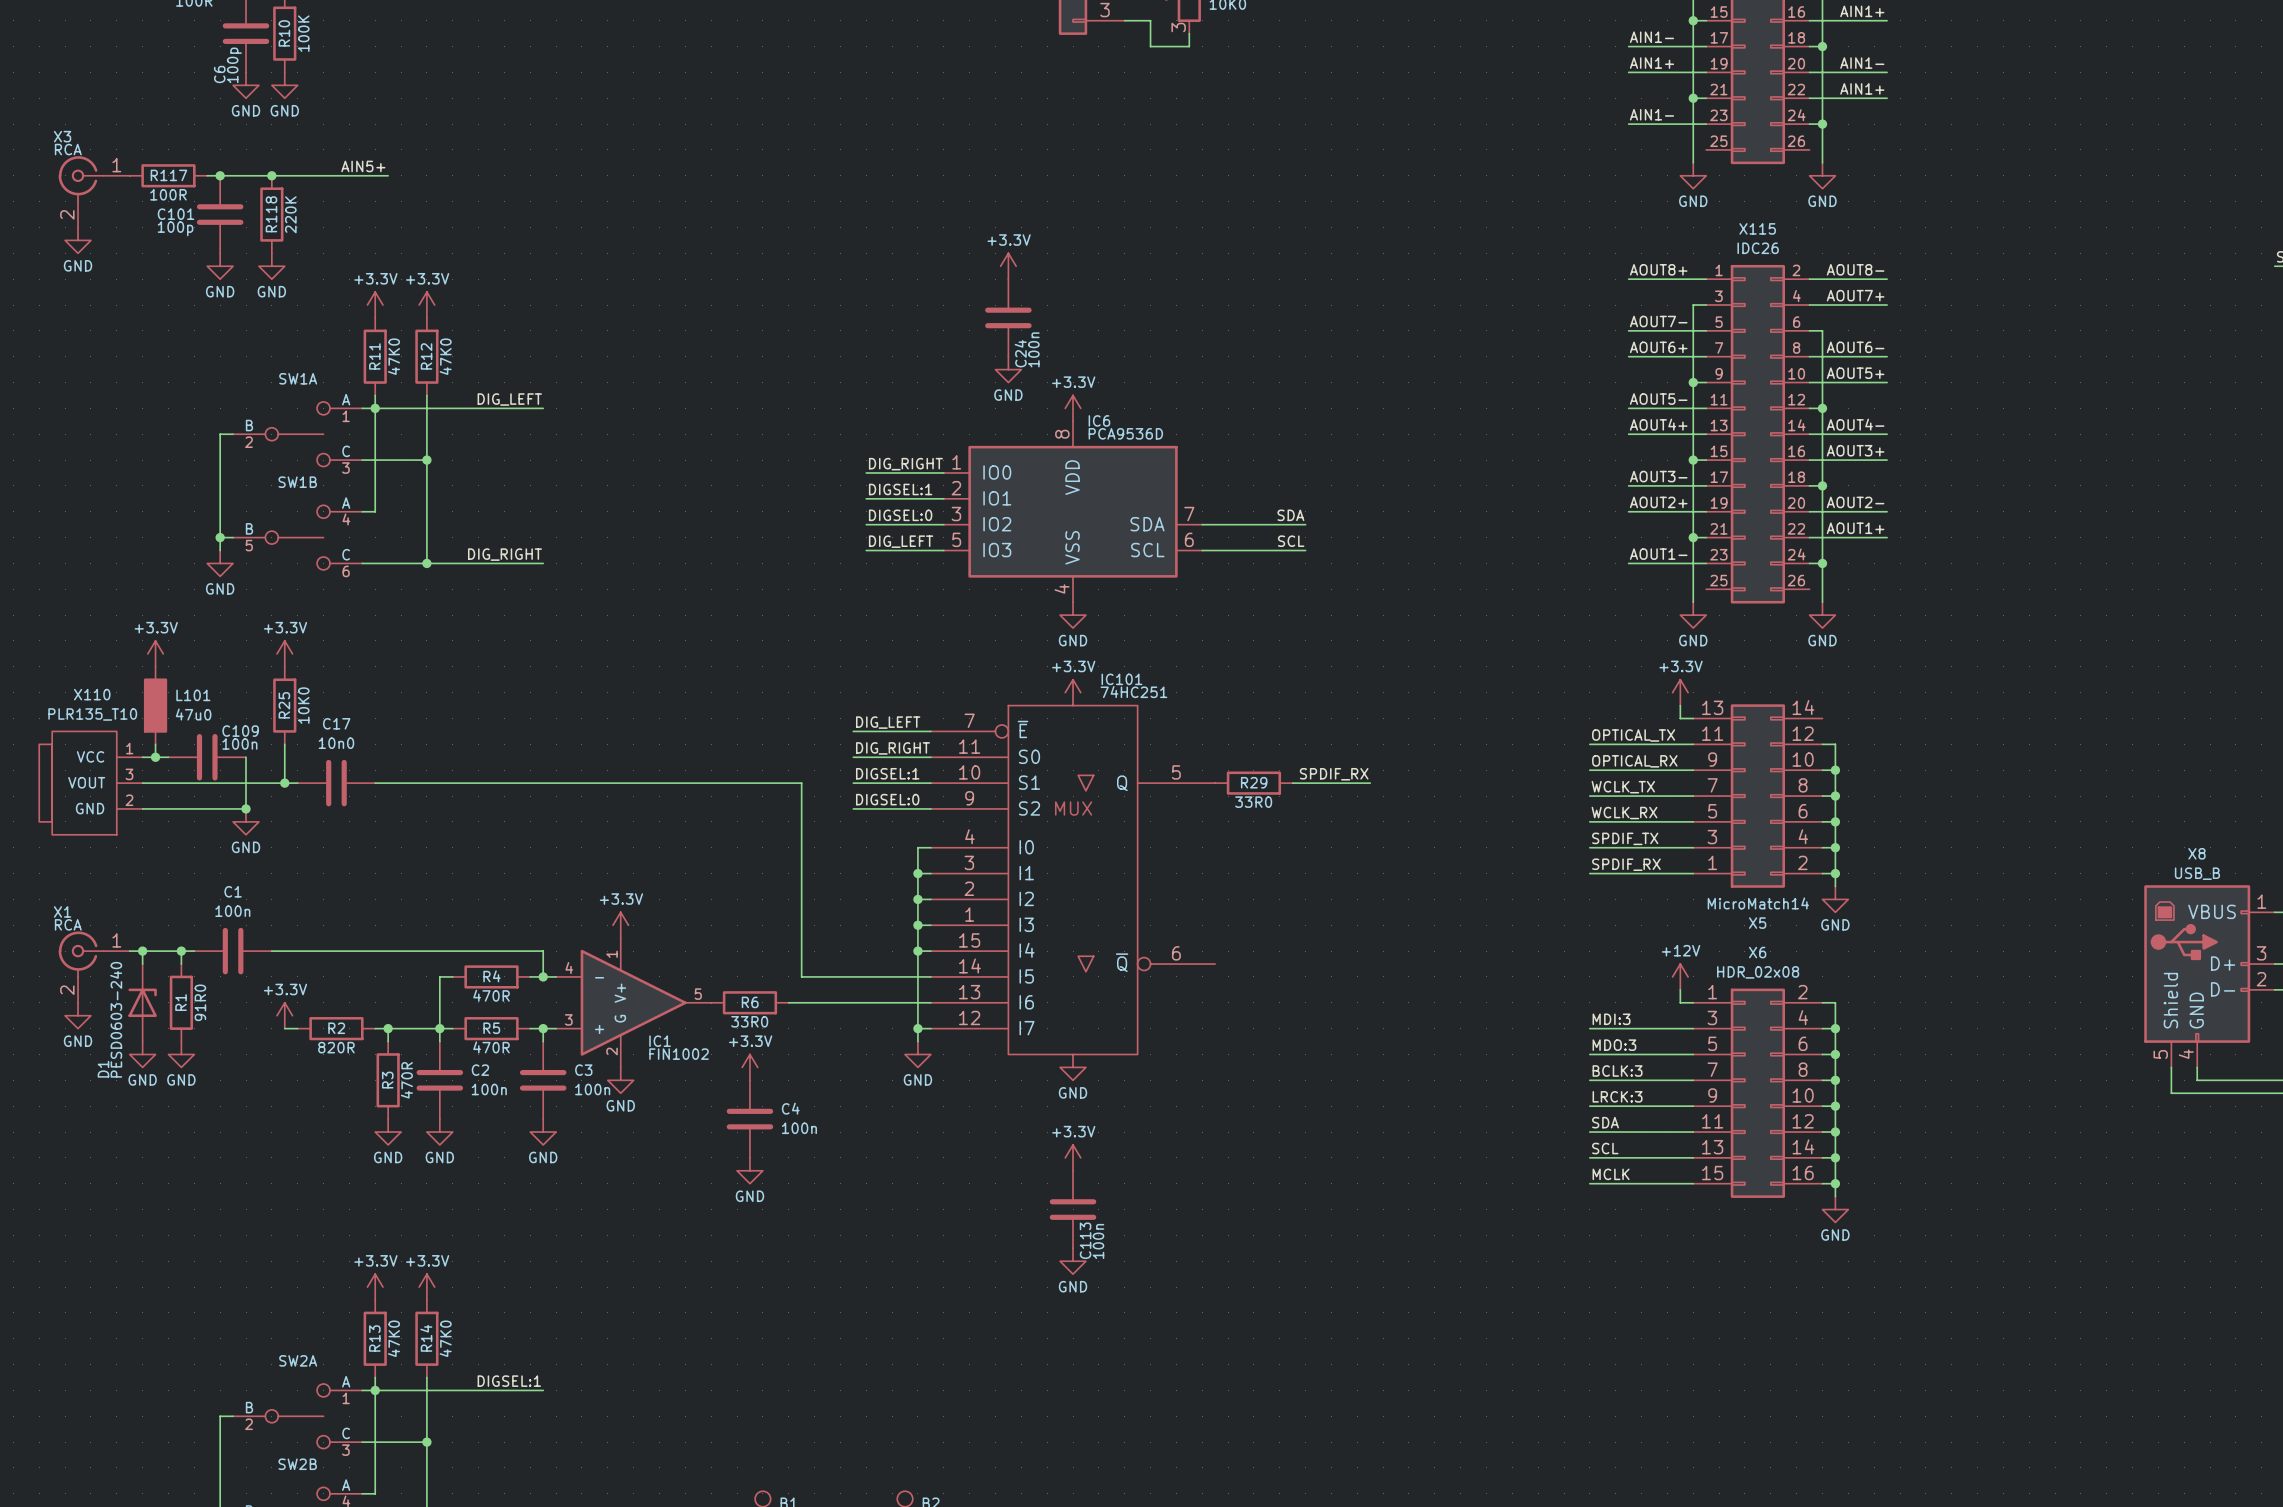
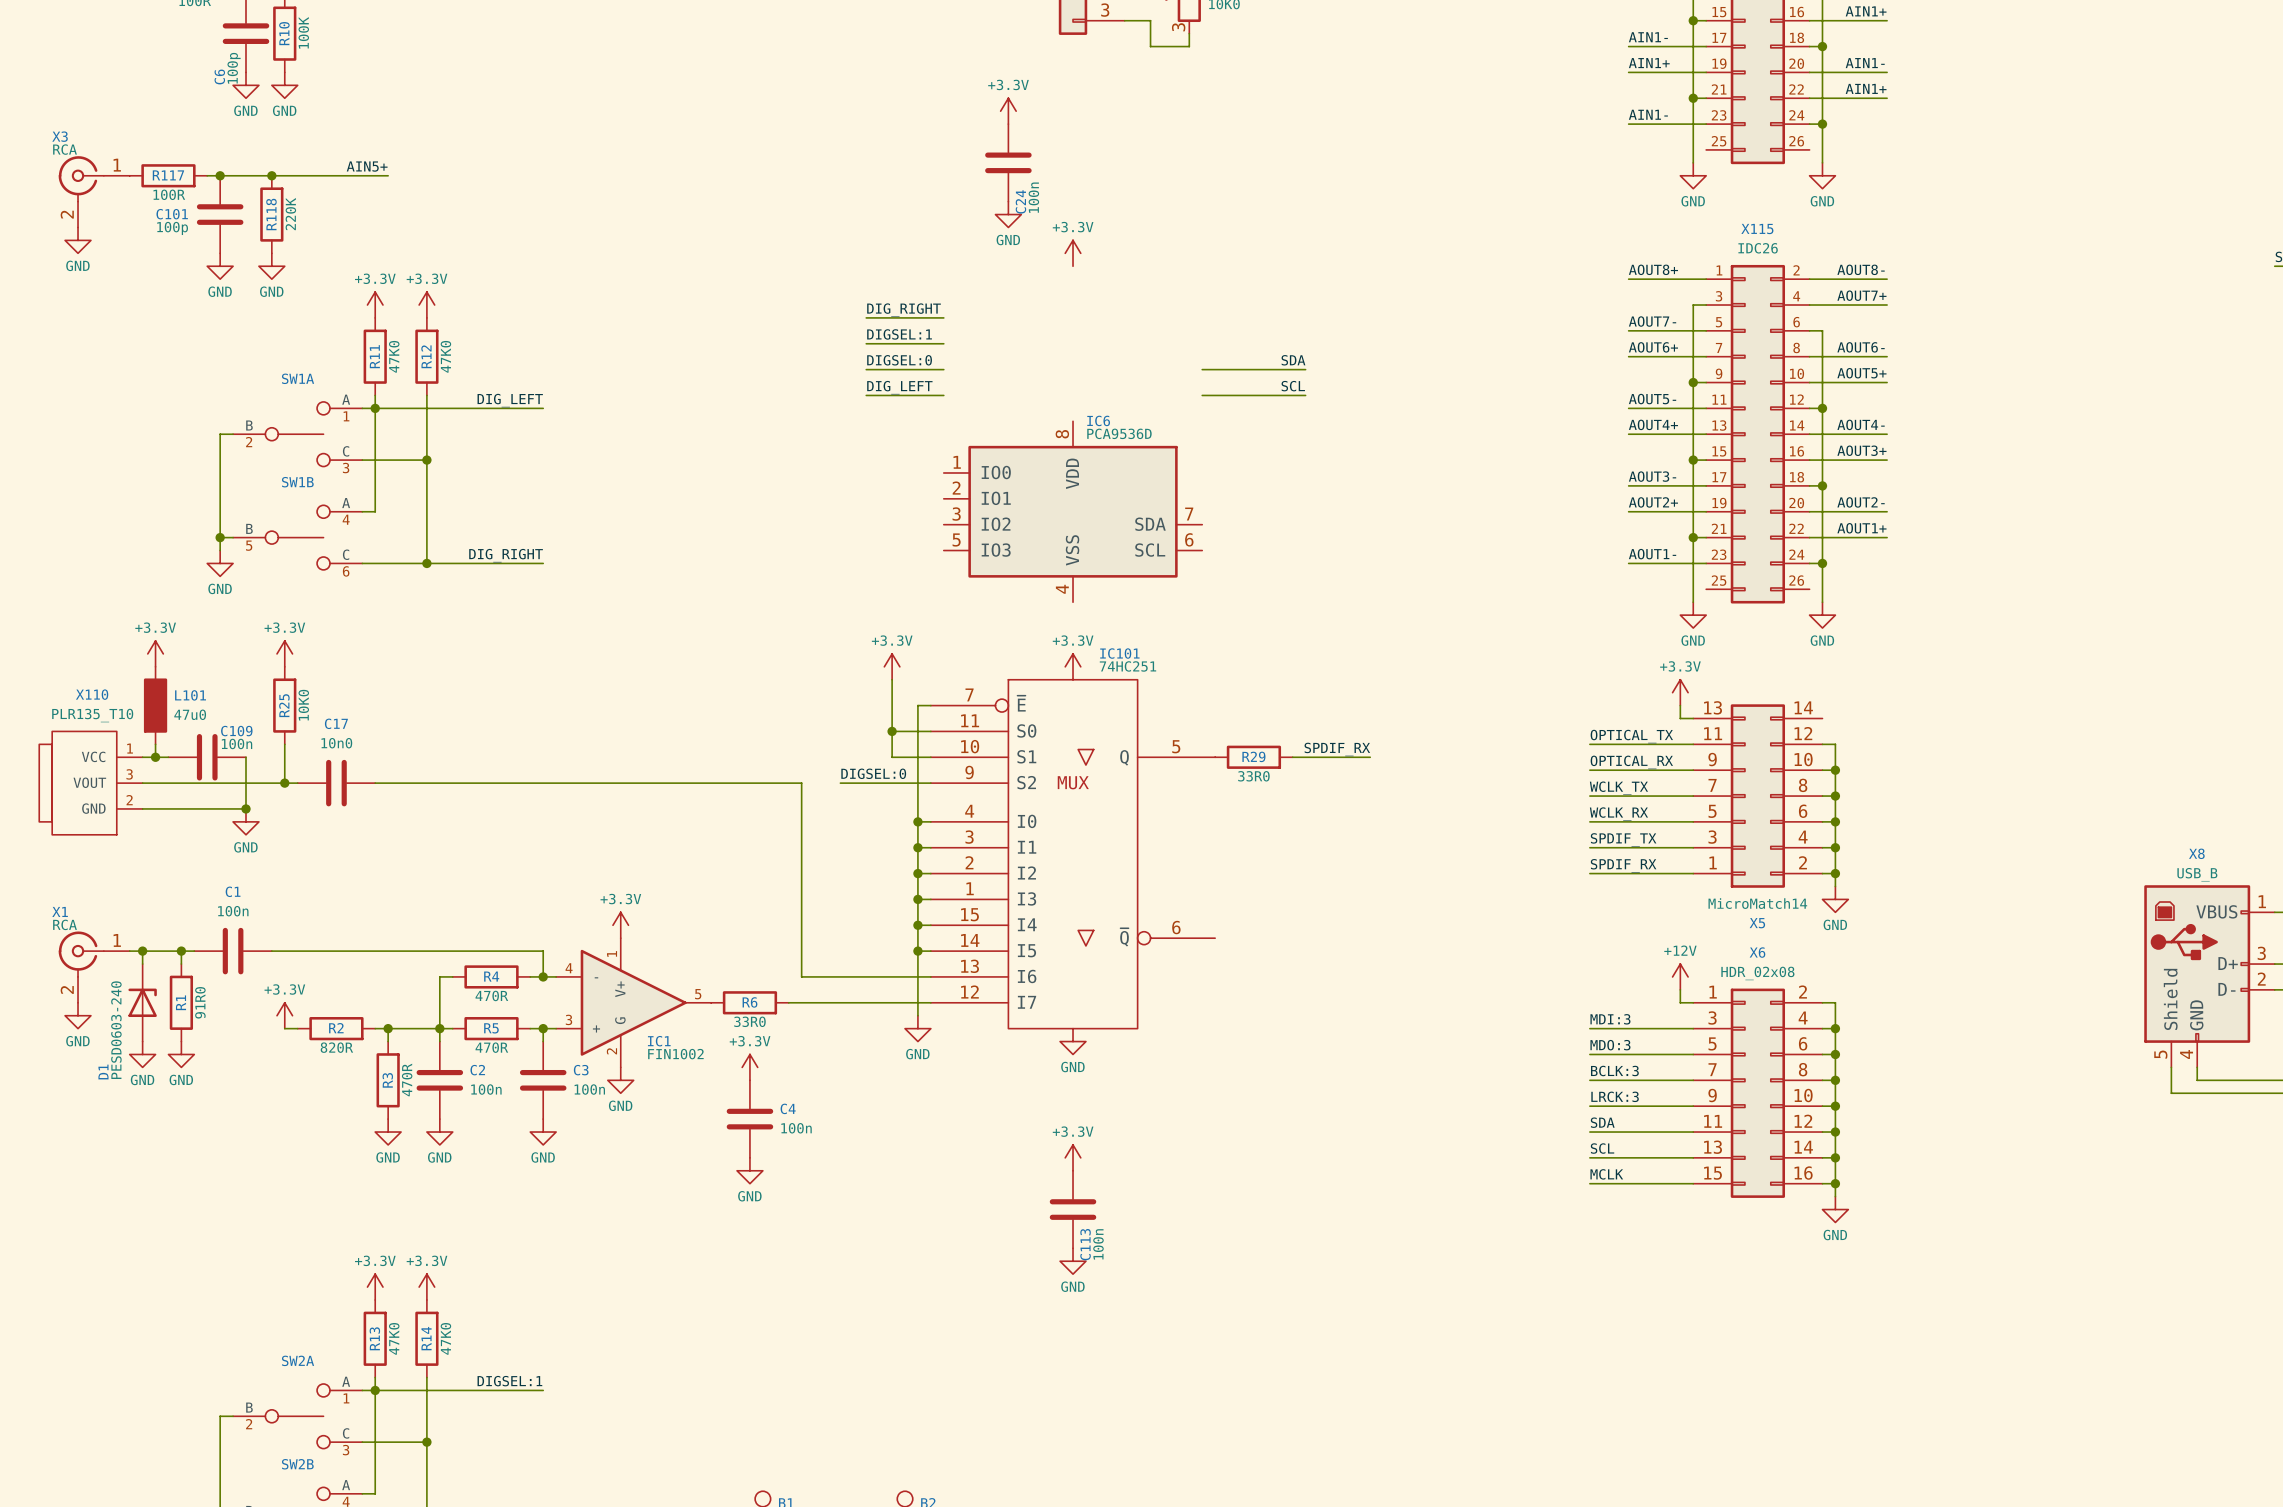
power symbol: none -> +3.3V (1008, 111)
power symbol position: +3.3V (1008, 266) -> +3.3V (1073, 253)
C24 position: (1008, 317) -> (1008, 162)
label: none -> DIGSEL:0 (899, 360)
power symbol position: GND (1008, 369) -> GND (1008, 214)
power symbol: +3.3V (1073, 408) -> none
label position: DIG_RIGHT (905, 464) -> DIG_RIGHT (904, 310)
wire: (866, 472) (943, 472) -> (866, 317) (943, 317)
label position: DIGSEL:1 (900, 489) -> DIGSEL:1 (899, 334)
wire: (866, 498) (943, 498) -> (866, 343) (943, 343)
label: DIGSEL:0 (900, 515) -> none
label position: SDA (1290, 515) -> SDA (1293, 360)
wire: (866, 524) (943, 524) -> (866, 369) (943, 369)
wire: (1202, 524) (1305, 524) -> (1202, 369) (1305, 369)
label position: DIG_LEFT (901, 541) -> DIG_LEFT (899, 387)
label position: SCL (1291, 541) -> SCL (1293, 386)
wire: (866, 550) (943, 550) -> (866, 395) (943, 395)
wire: (1202, 550) (1305, 550) -> (1202, 395) (1305, 395)
power symbol: GND (1073, 615) -> none
power symbol: none -> +3.3V (892, 666)
power symbol position: +3.3V (1073, 692) -> +3.3V (1073, 666)
wire: none -> (930, 705) (917, 705) (917, 847)
label: DIG_LEFT (888, 722) -> none
wire: (853, 731) (892, 731) -> none
junction: none -> (892, 731)
label: DIG_RIGHT (892, 748) -> none
wire: (853, 757) (892, 757) -> (892, 679) (892, 757)
label: DIGSEL:1 (887, 773) -> none
label position: SPDIF_RX (1334, 774) -> SPDIF_RX (1337, 749)
wire: none -> (840, 783) (853, 783)
R29 position: (1253, 783) -> (1253, 757)
wire: (1292, 783) (1370, 783) -> (1292, 757) (1370, 757)
label position: DIGSEL:0 (887, 799) -> DIGSEL:0 (873, 773)
wire: (853, 808) (930, 808) -> none
junction: none -> (917, 821)
junction: none -> (917, 847)
IC101 position: (1073, 880) -> (1073, 854)
junction: (917, 1028) -> none
power symbol position: GND (917, 1054) -> GND (917, 1028)
power symbol position: GND (1073, 1067) -> GND (1073, 1041)

